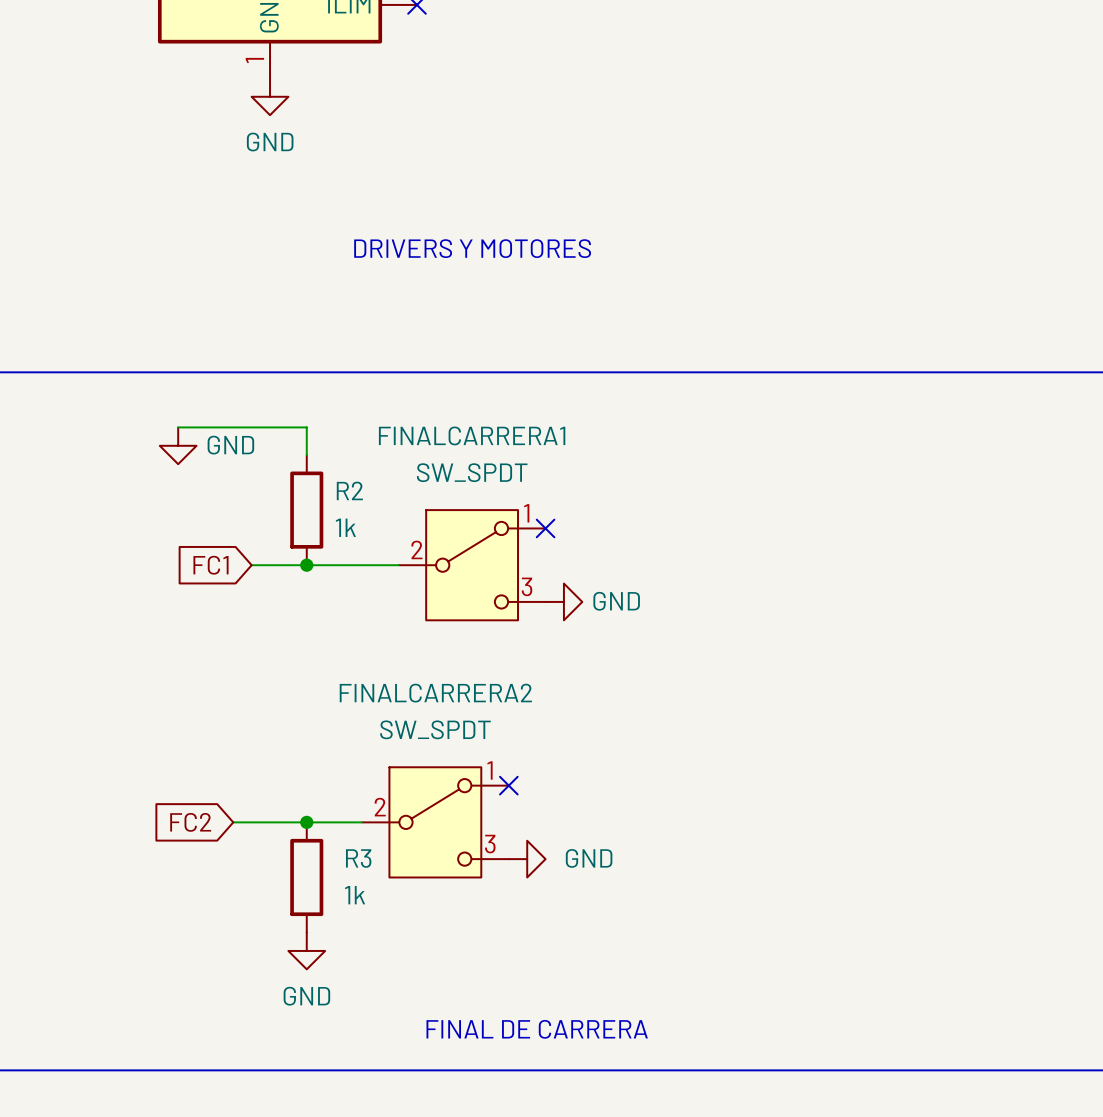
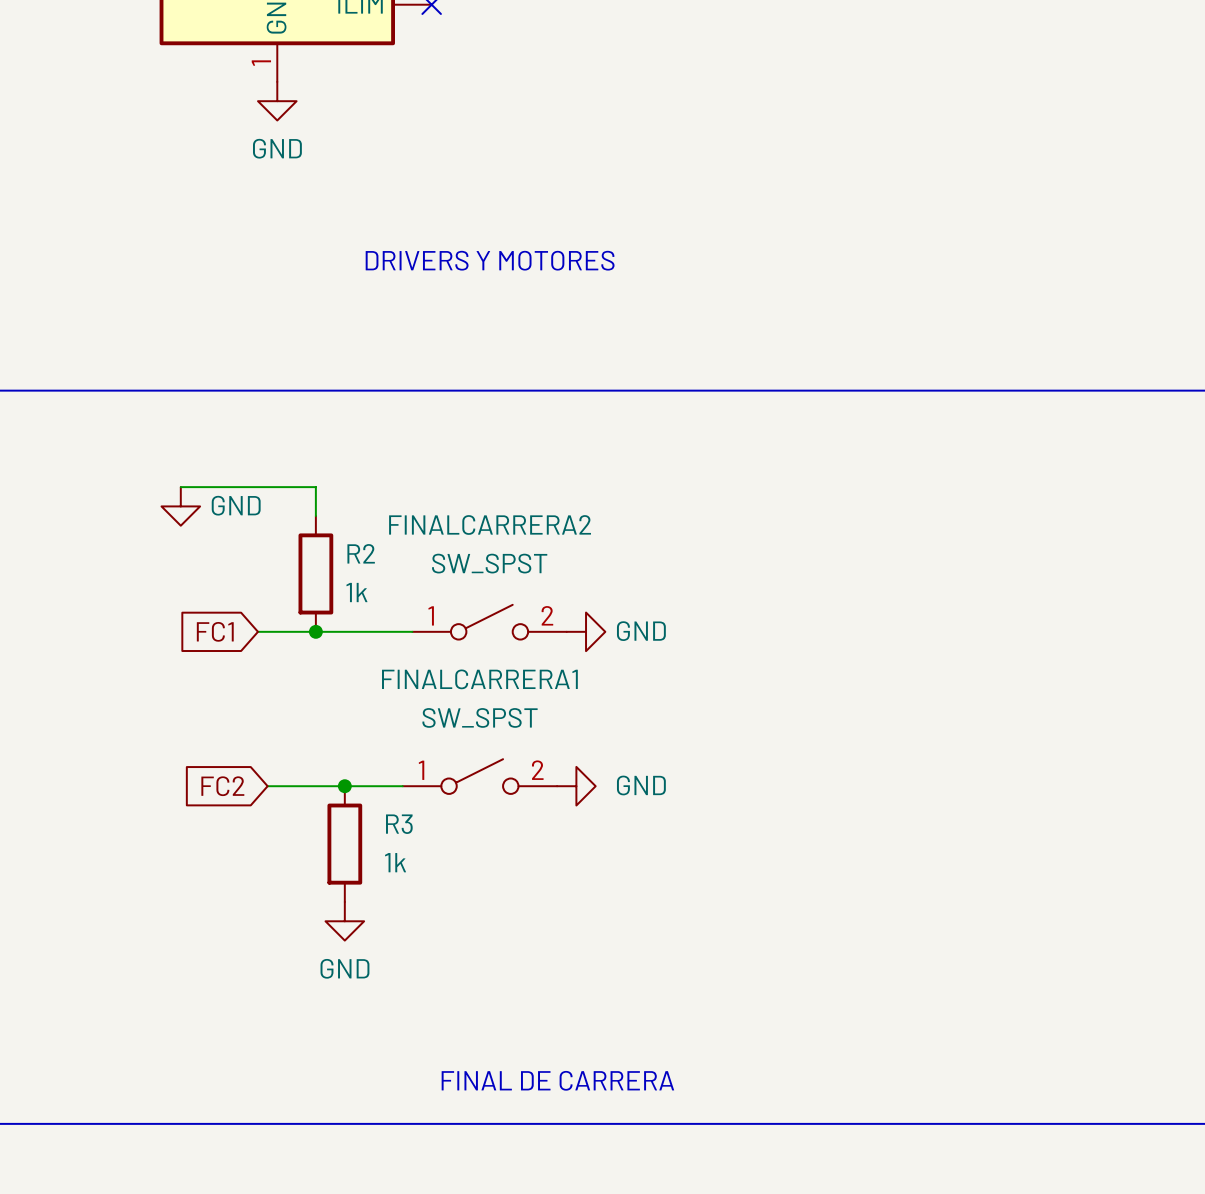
wire: (178, 427) (306, 427) (306, 454) -> (180, 487) (315, 487) (315, 516)
FINALCARRERA1 name position: FINALCARRERA1 (472, 435) -> FINALCARRERA1 (479, 679)
power symbol position: GND (178, 445) -> GND (180, 506)
FINALCARRERA1 value: SW_SPDT (472, 472) -> SW_SPST (480, 717)
R2 position: (306, 510) -> (315, 573)
FINALCARRERA1 symbol: [398, 510, 546, 621] -> [402, 759, 558, 794]
no-connect mark: (545, 528) -> none
global label position: FC1 (211, 565) -> FC1 (215, 631)
wire: (251, 565) (398, 565) -> (257, 631) (412, 631)
junction position: (306, 565) -> (315, 631)
FINALCARRERA2 name position: FINALCARRERA2 (435, 693) -> FINALCARRERA2 (490, 525)
FINALCARRERA2 value: SW_SPDT (435, 729) -> SW_SPST (489, 563)
power symbol: none -> GND (576, 786)
FINALCARRERA2 symbol: [361, 767, 509, 878] -> [412, 604, 567, 640]
no-connect mark: (508, 785) -> none
global label position: FC2 (190, 822) -> FC2 (222, 786)
wire: (233, 822) (361, 822) -> (267, 786) (402, 786)
junction position: (306, 822) -> (344, 786)
power symbol: GND (527, 859) -> none
R3 position: (306, 877) -> (344, 844)
power symbol position: GND (306, 950) -> GND (344, 921)

